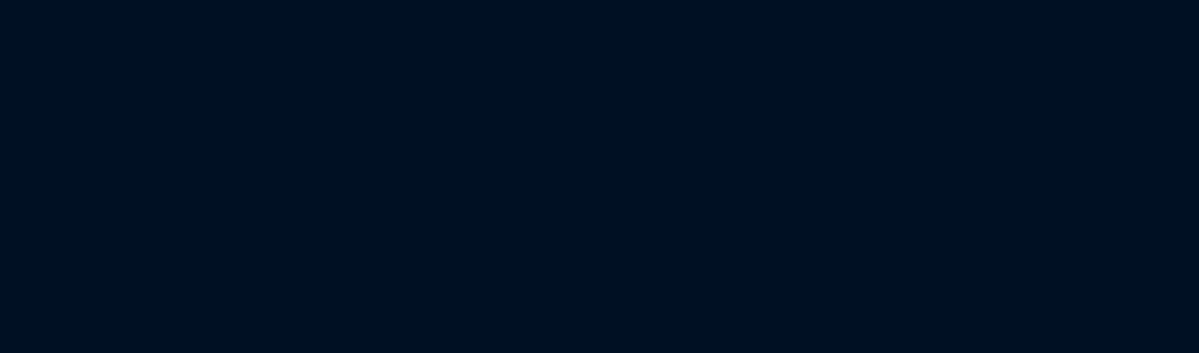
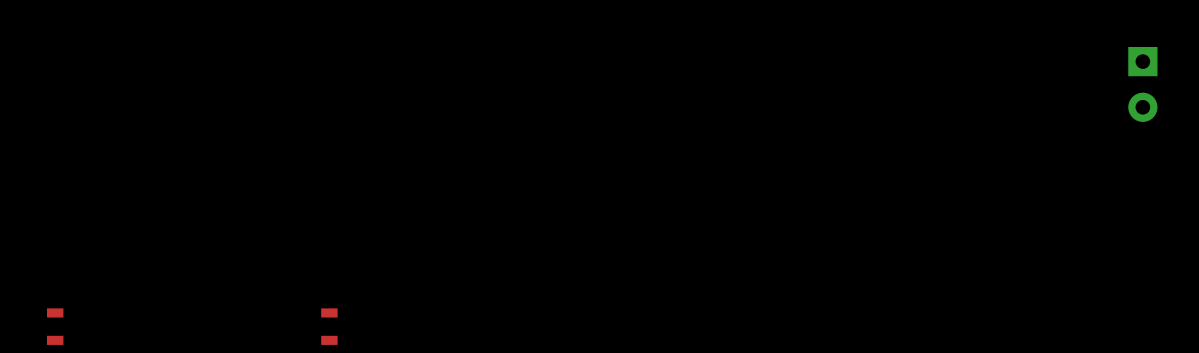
part: none -> (1142, 84)
part: none -> (55, 326)
part: none -> (329, 326)

